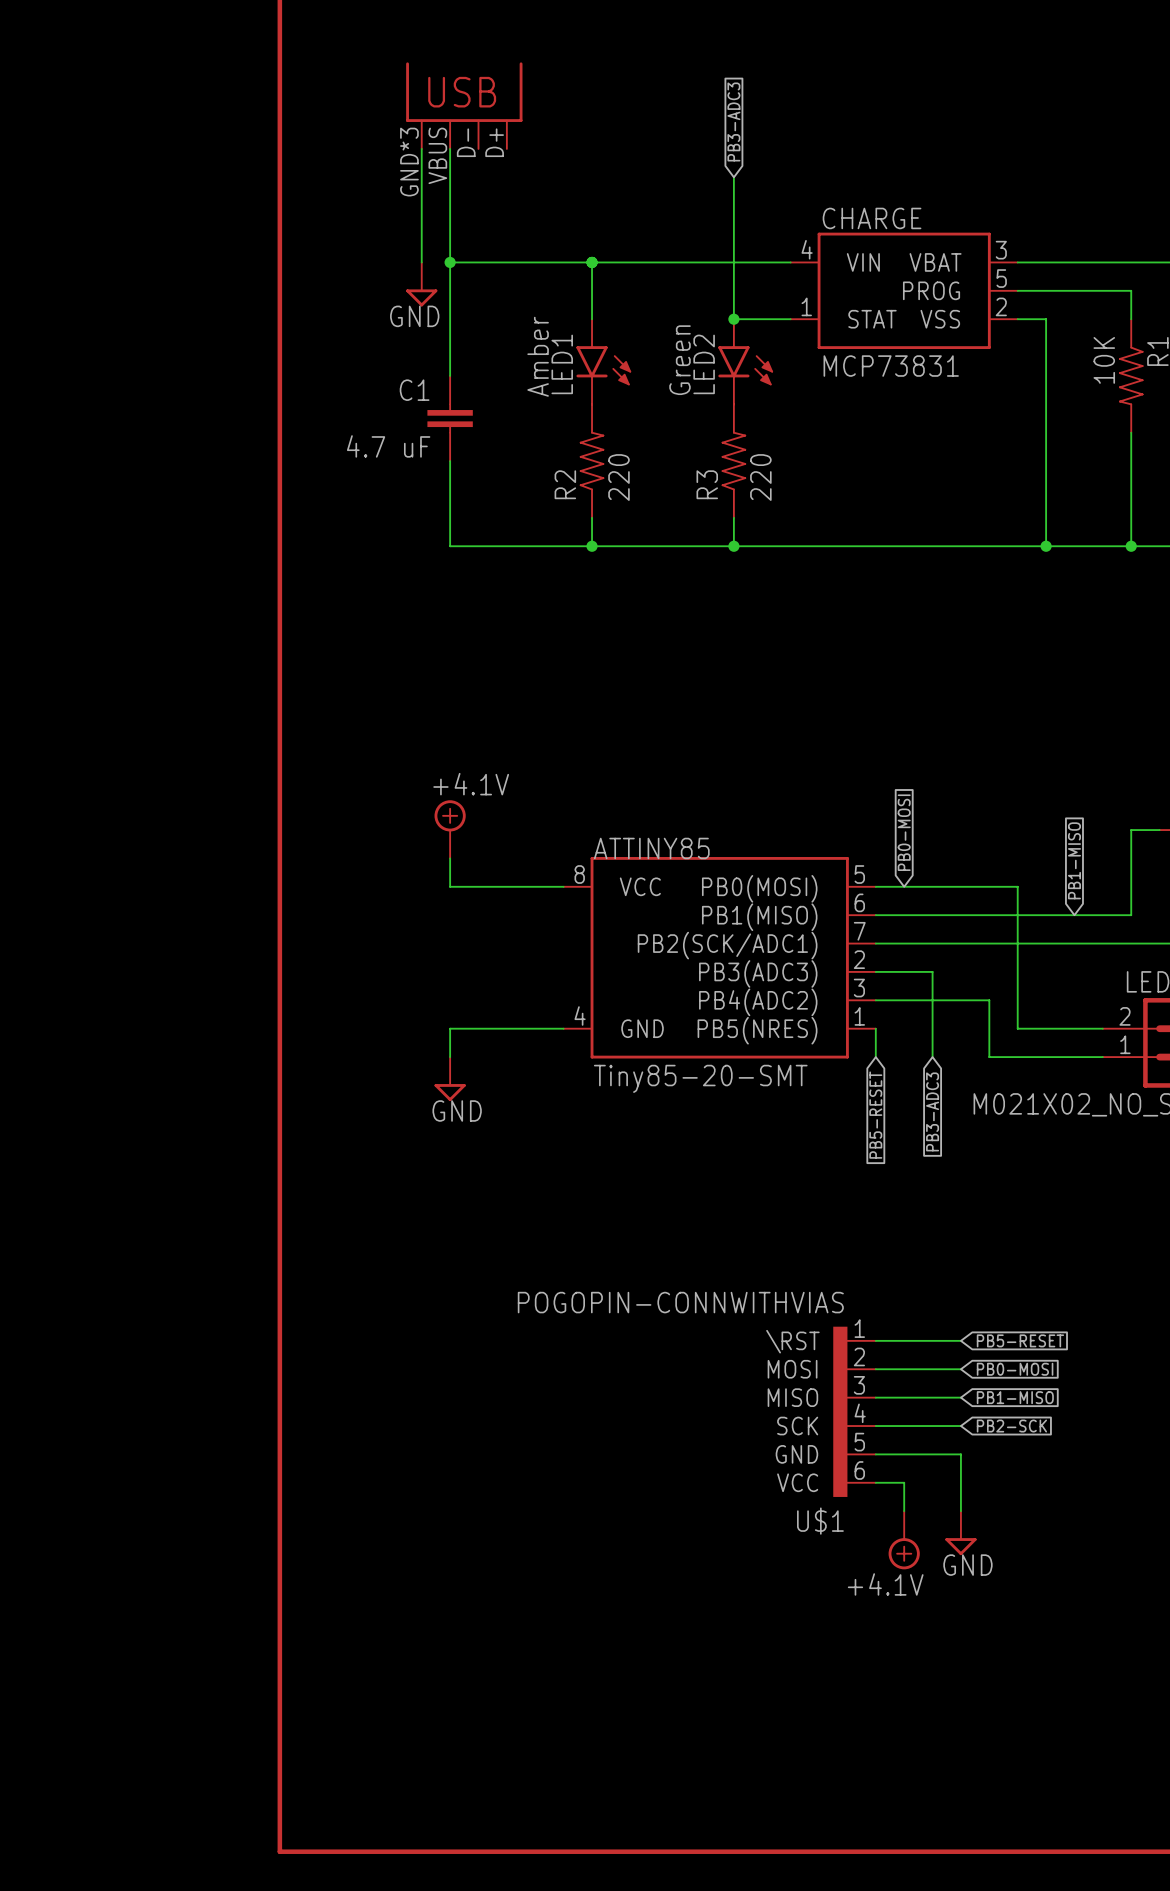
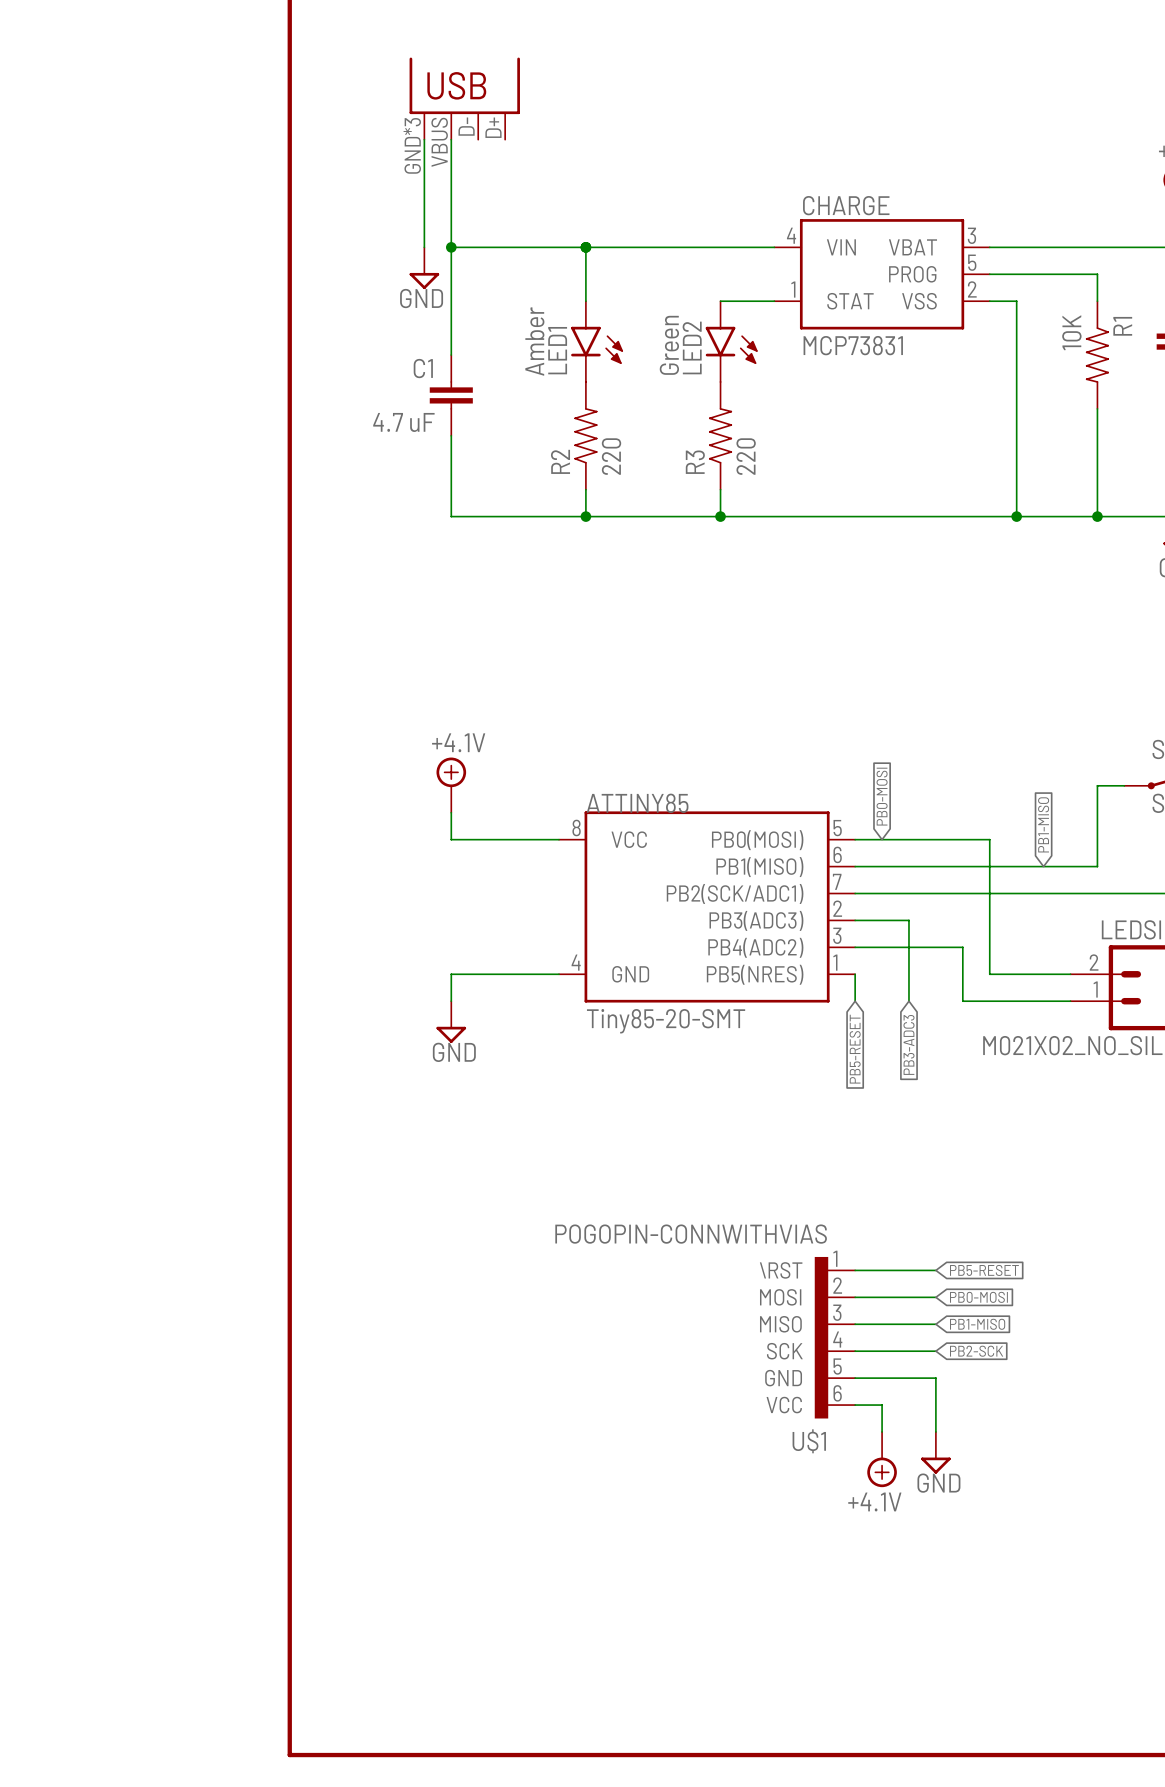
global label: PB3-ADC3 (733, 121) -> none
wire: (733, 177) (733, 319) -> none
junction: (733, 319) -> none

